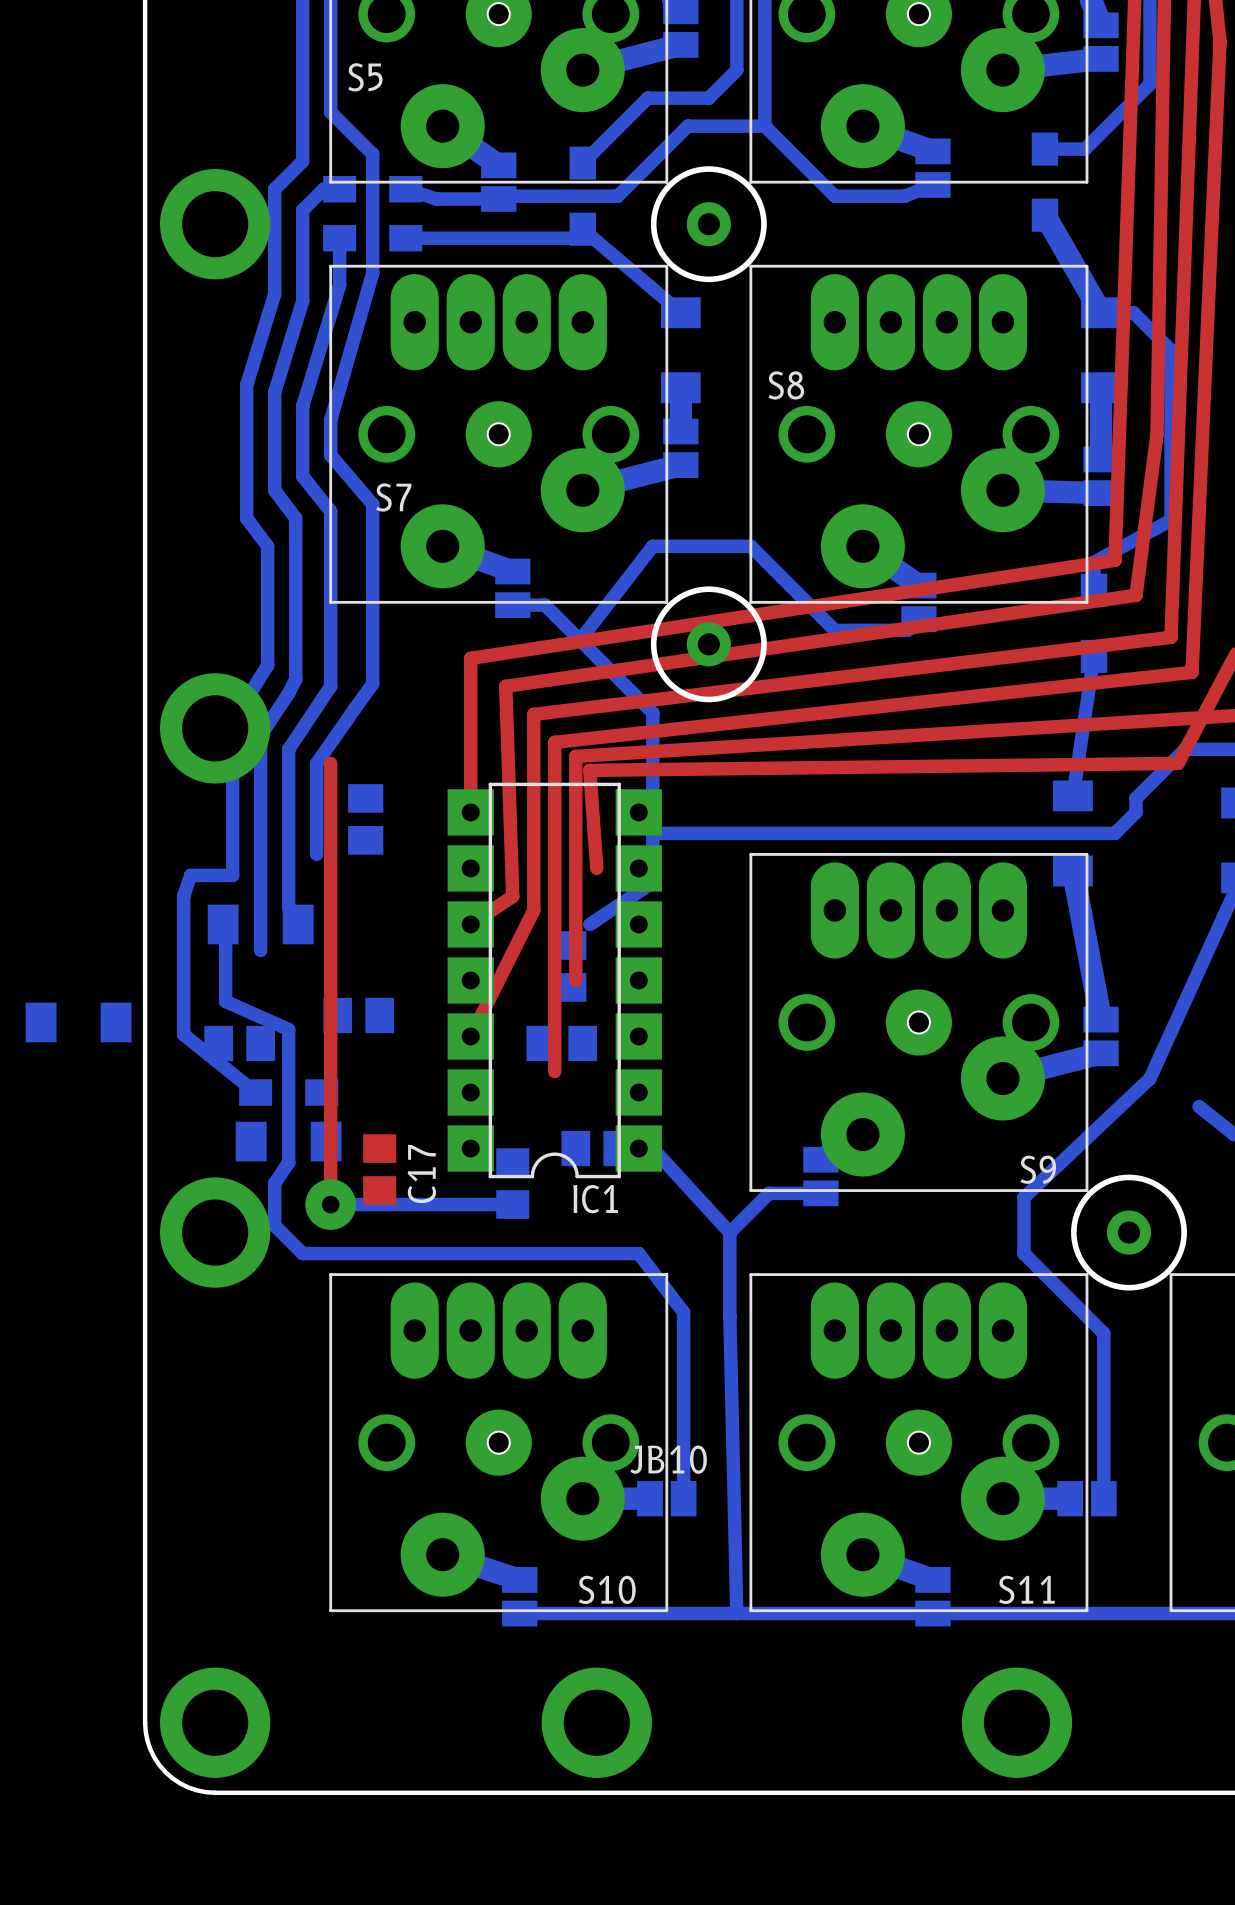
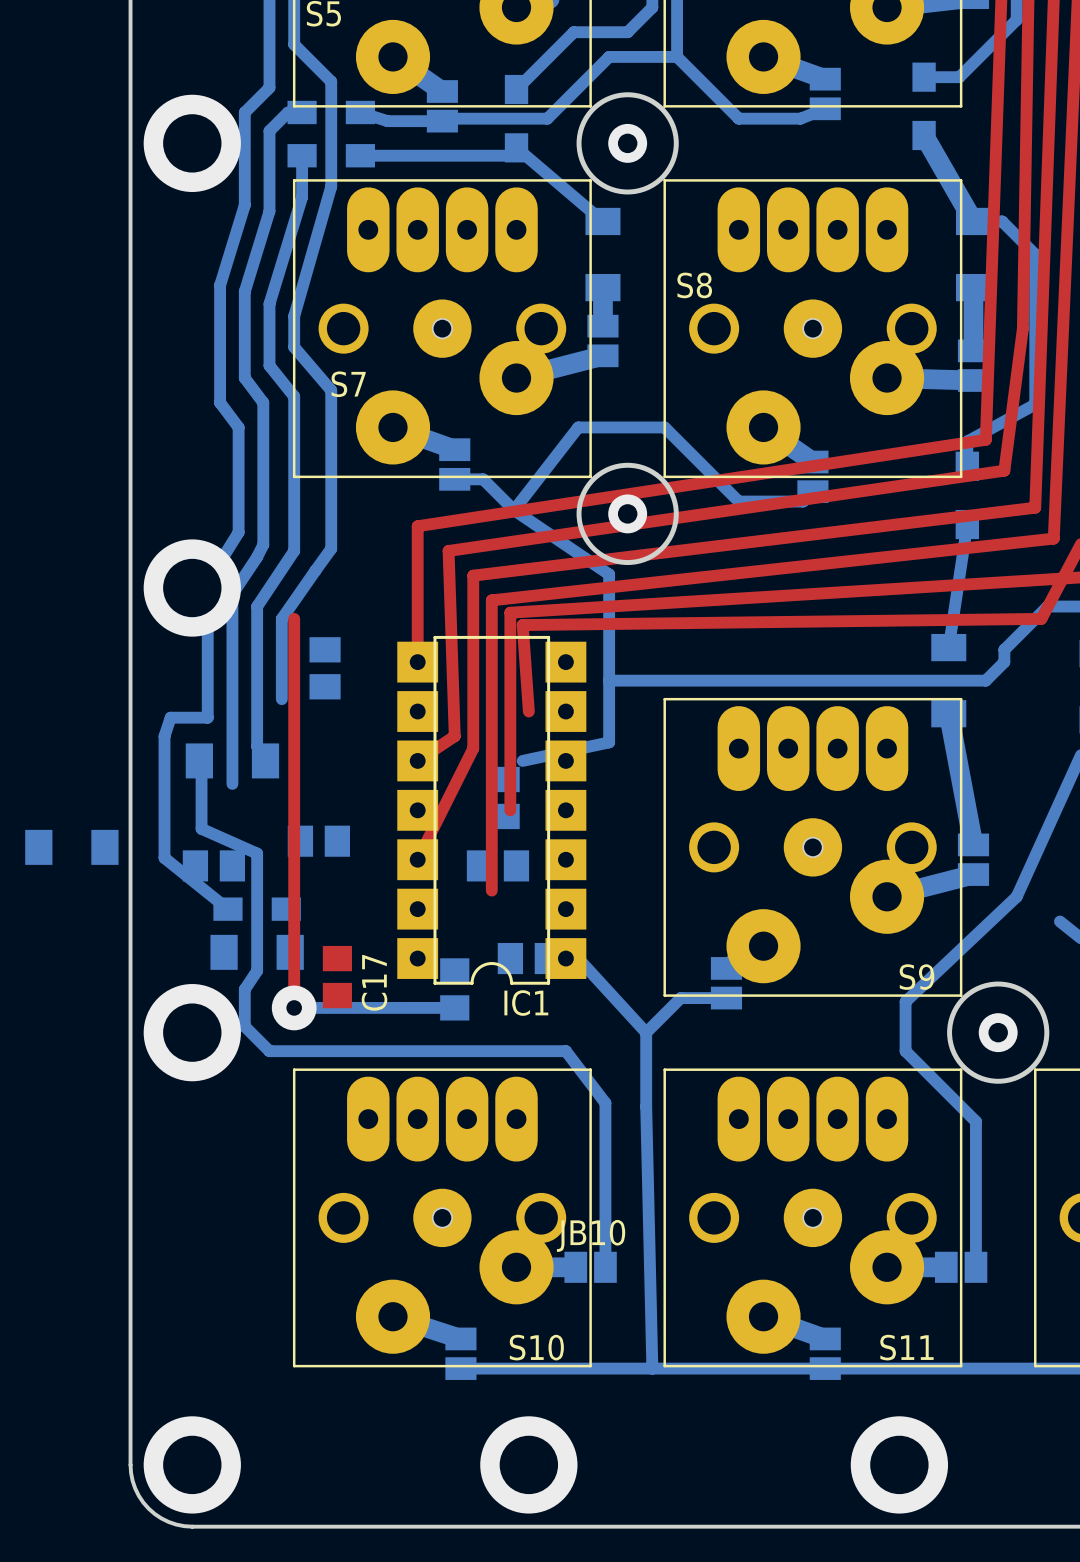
bottom track: (579, 640) (652, 712) (652, 882) (589, 924) -> (514, 510) (609, 574) (609, 742) (522, 760)
bottom track: (652, 833) (687, 833) -> none

